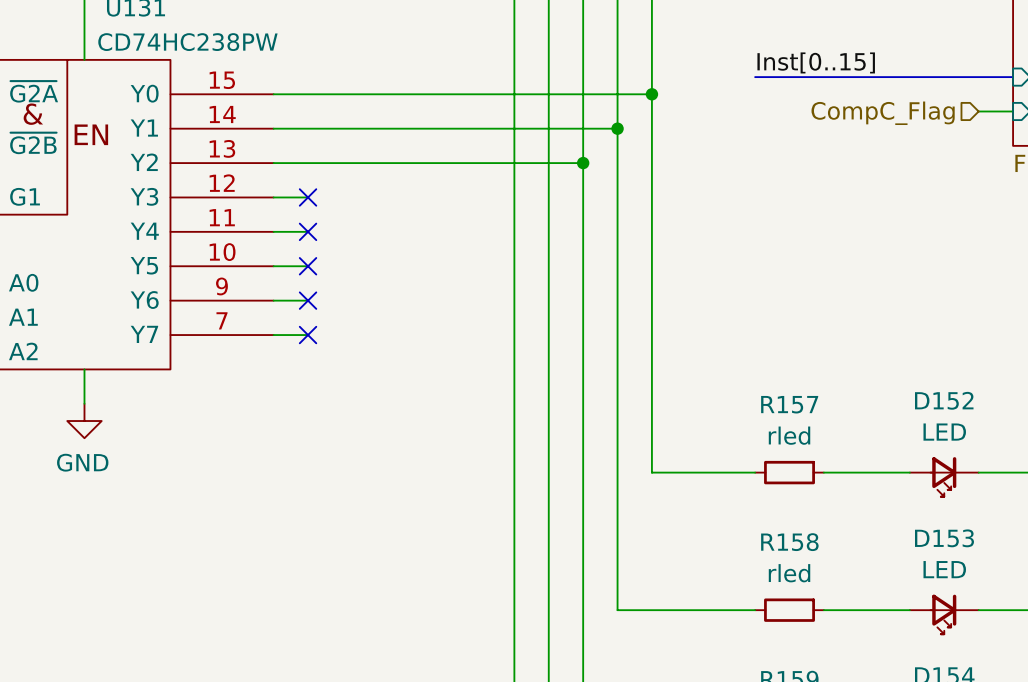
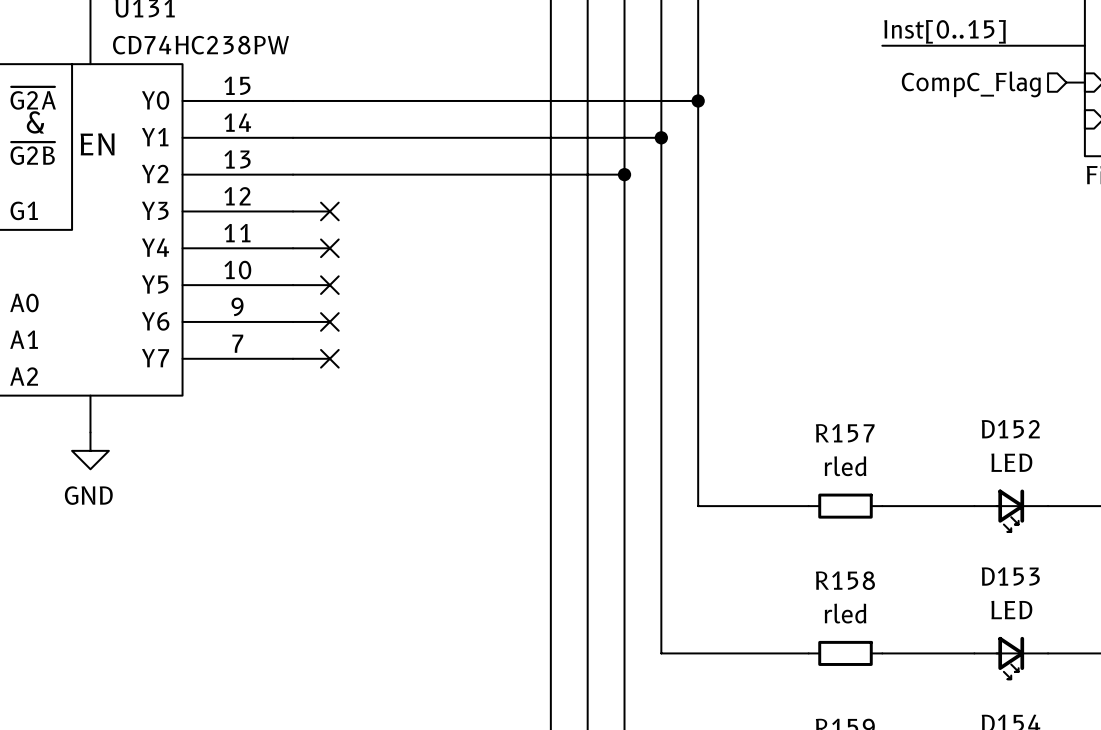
bus: none -> (882, 45) (1084, 45)
label position: Inst[0..15] (816, 62) -> Inst[0..15] (945, 31)
bus: (755, 77) (1013, 77) -> none
wire: (978, 111) (1013, 111) -> none
hierarchical label position: CompC_Flag (883, 113) -> CompC_Flag (971, 84)

